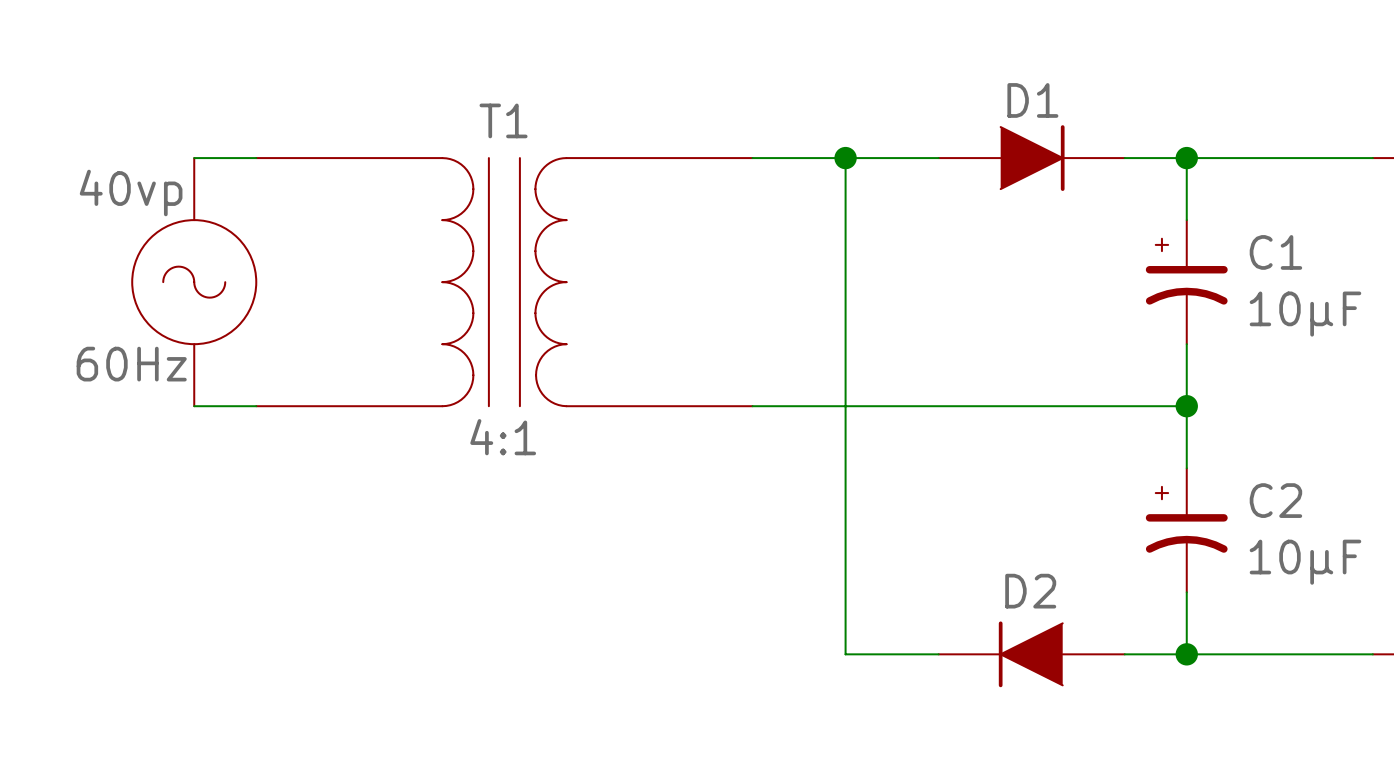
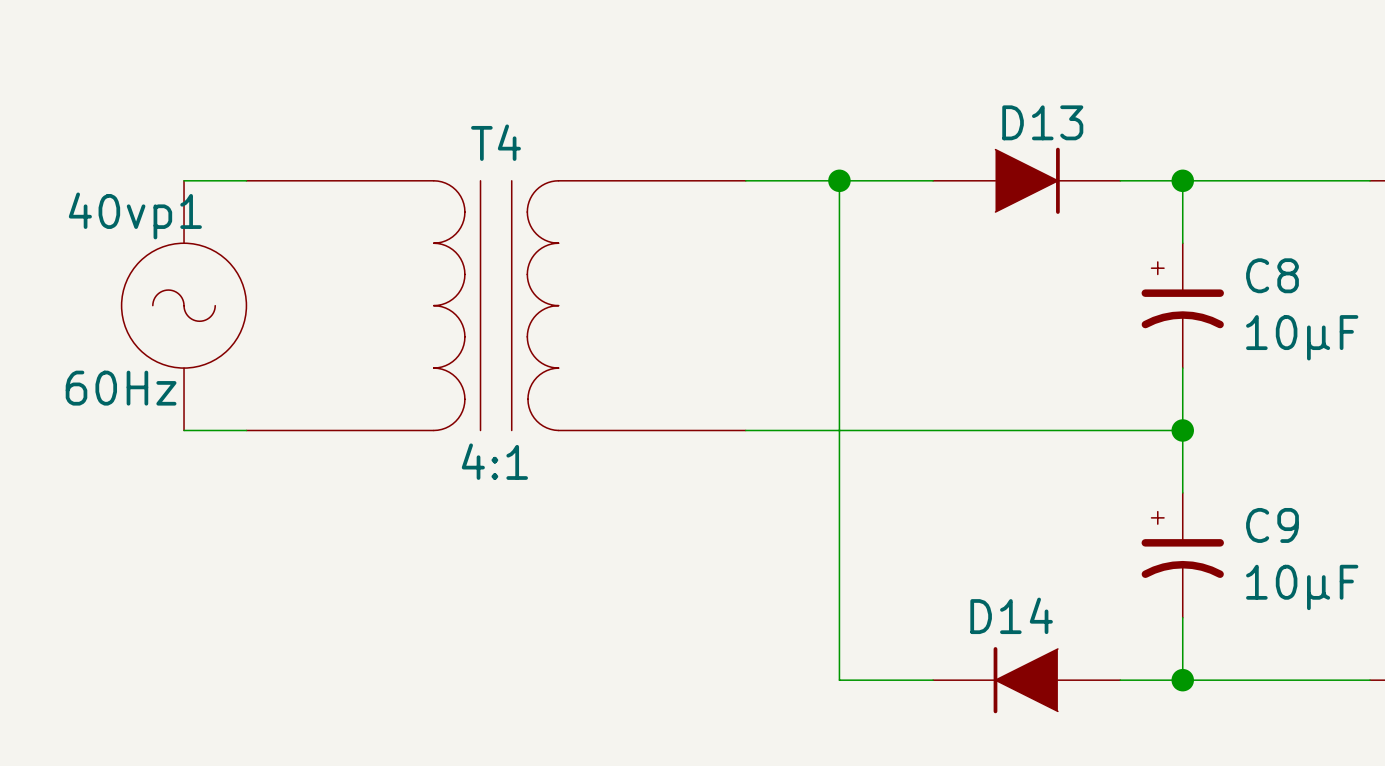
D1 name: D1 (1032, 100) -> D13 (1042, 122)
T1 name: T1 (503, 120) -> T4 (496, 142)
40vp name: 40vp (131, 192) -> 40vp1 (135, 215)
C1 name: C1 (1275, 252) -> C8 (1272, 275)
C2 name: C2 (1275, 500) -> C9 (1272, 525)
D2 name: D2 (1030, 591) -> D14 (1011, 615)

